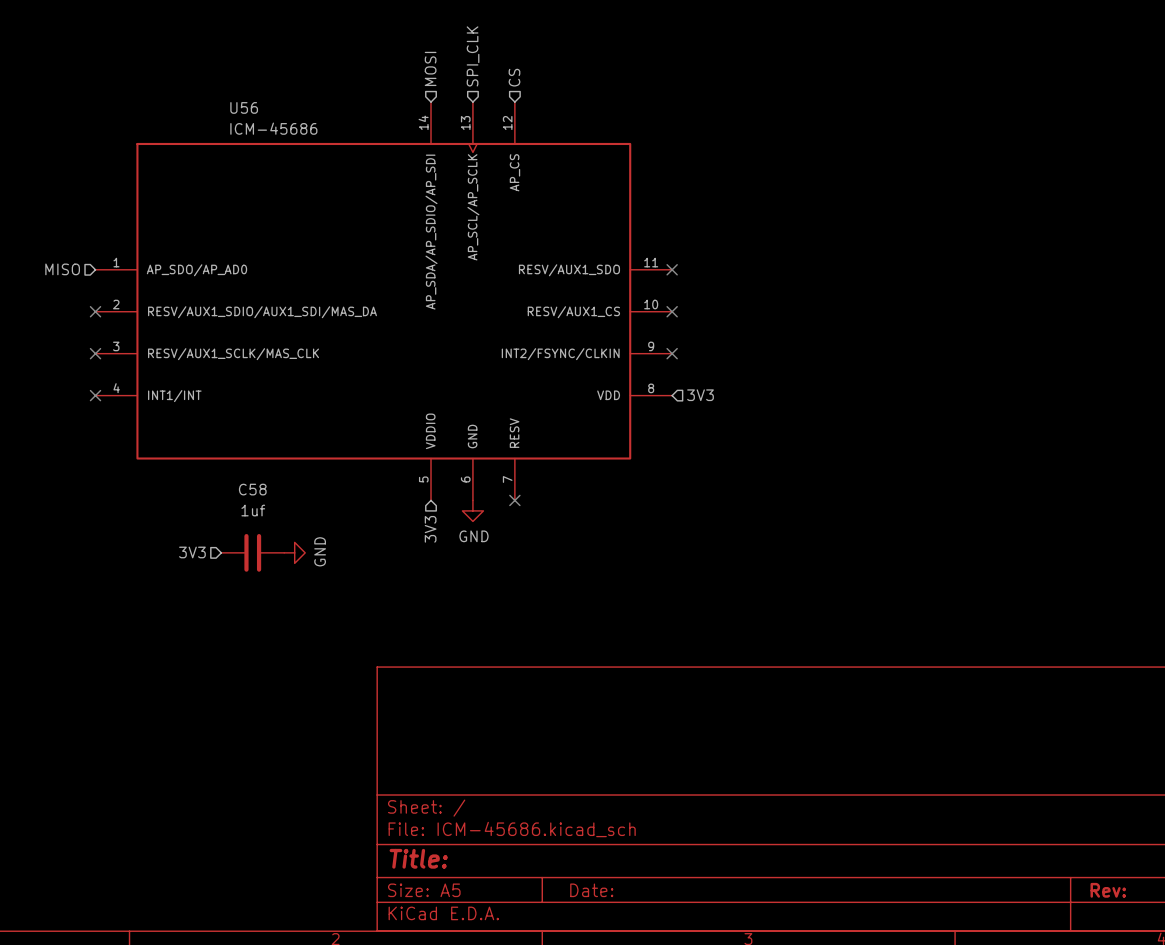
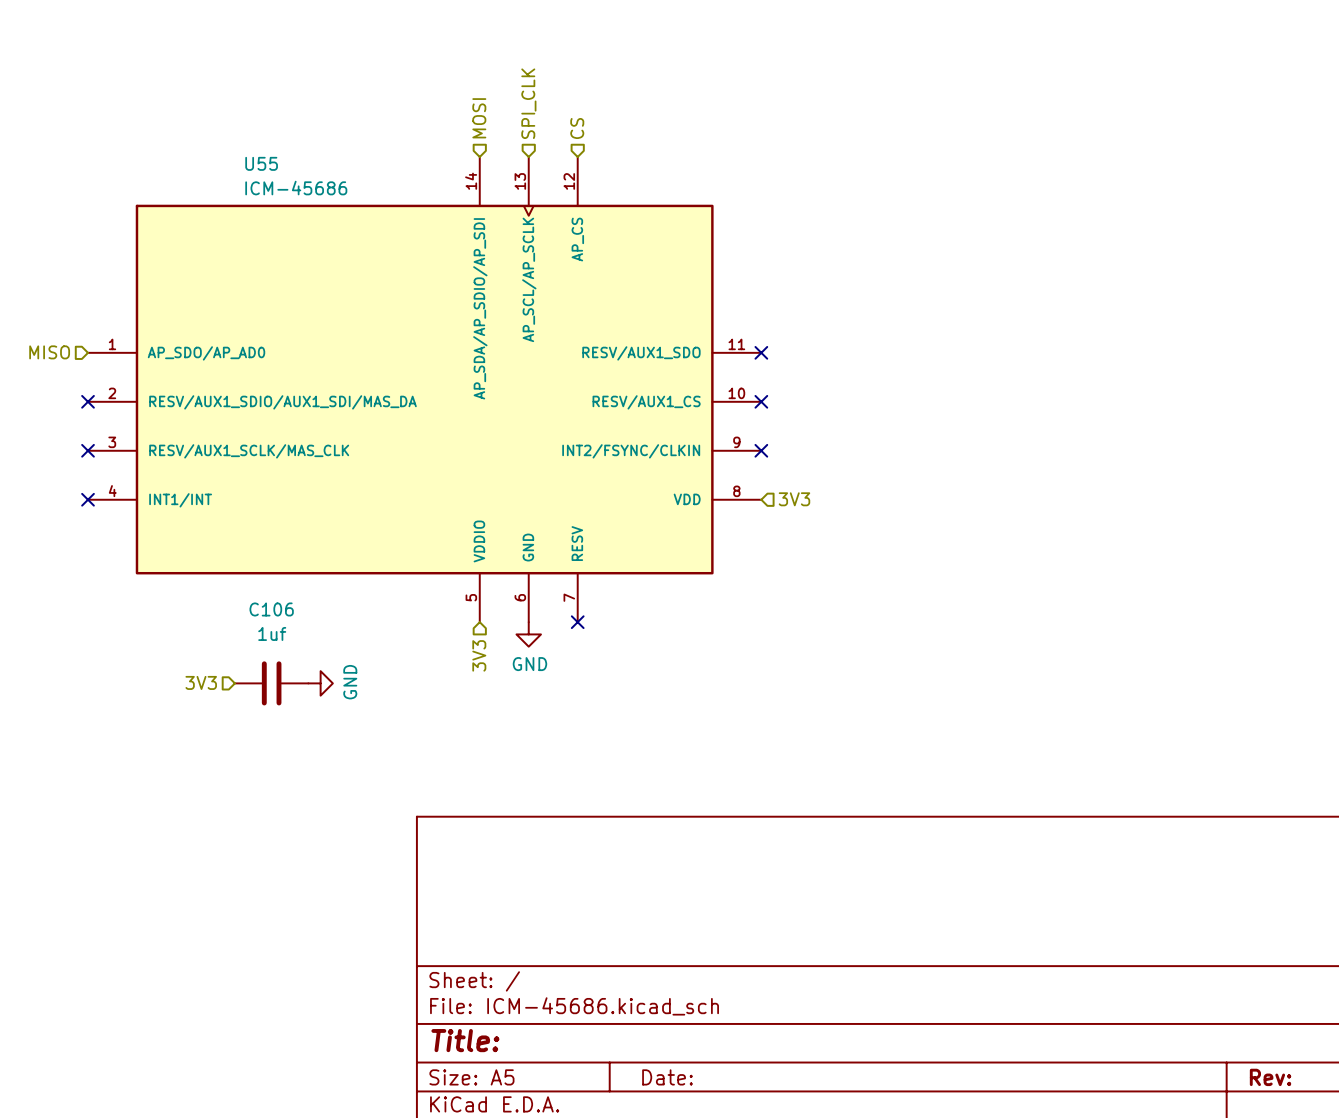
U56 name: U56 (244, 107) -> U55 (261, 163)
C58 name: C58 (252, 489) -> C106 (271, 609)

